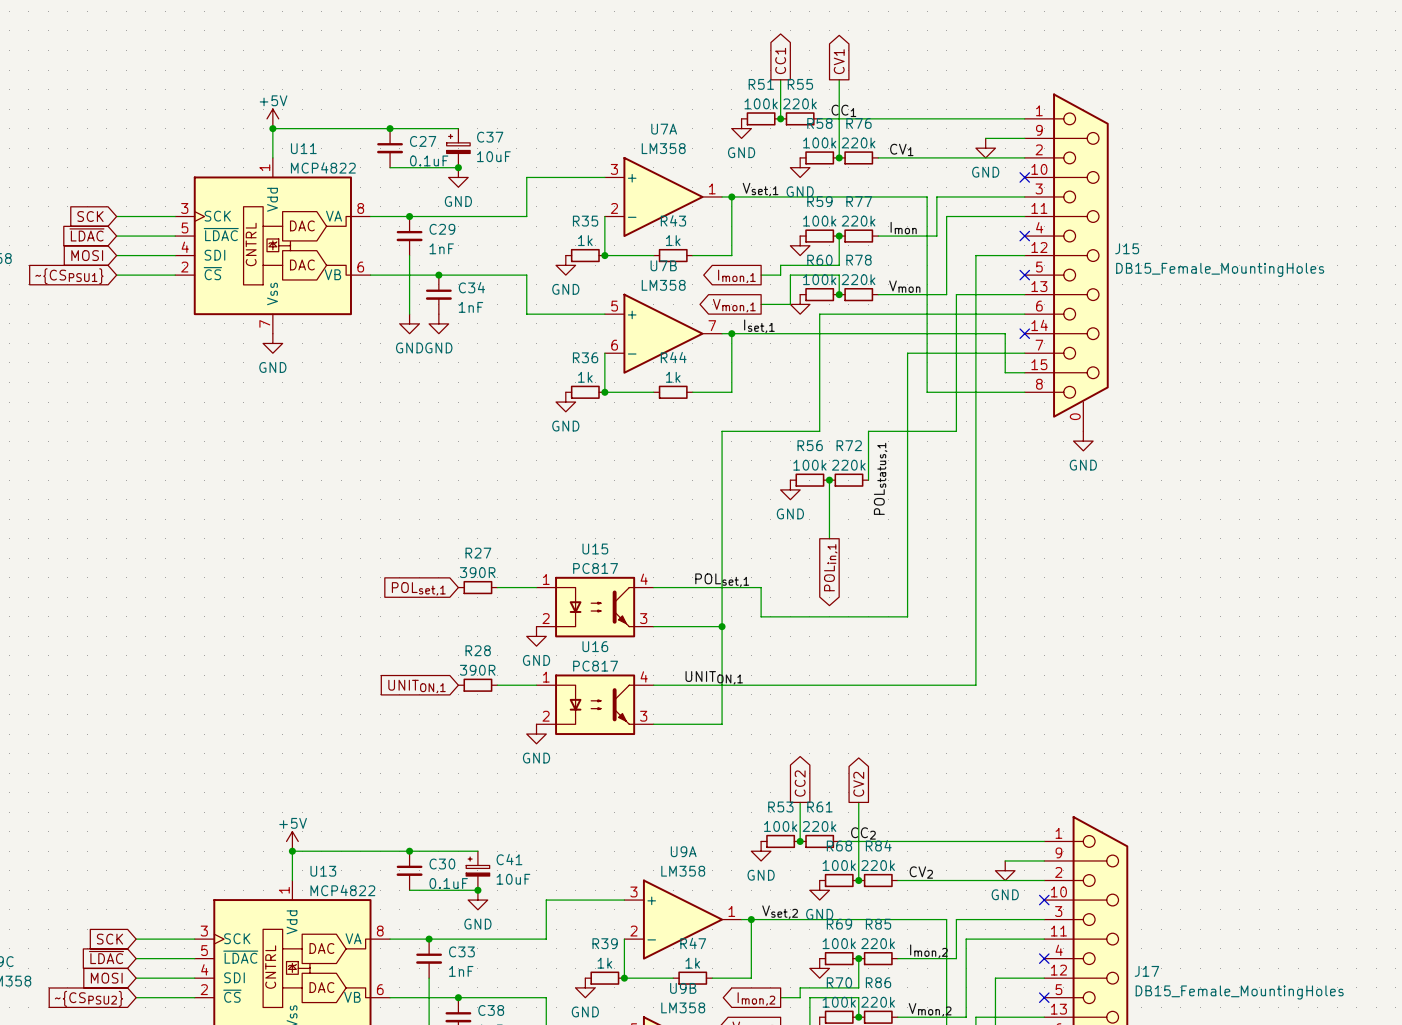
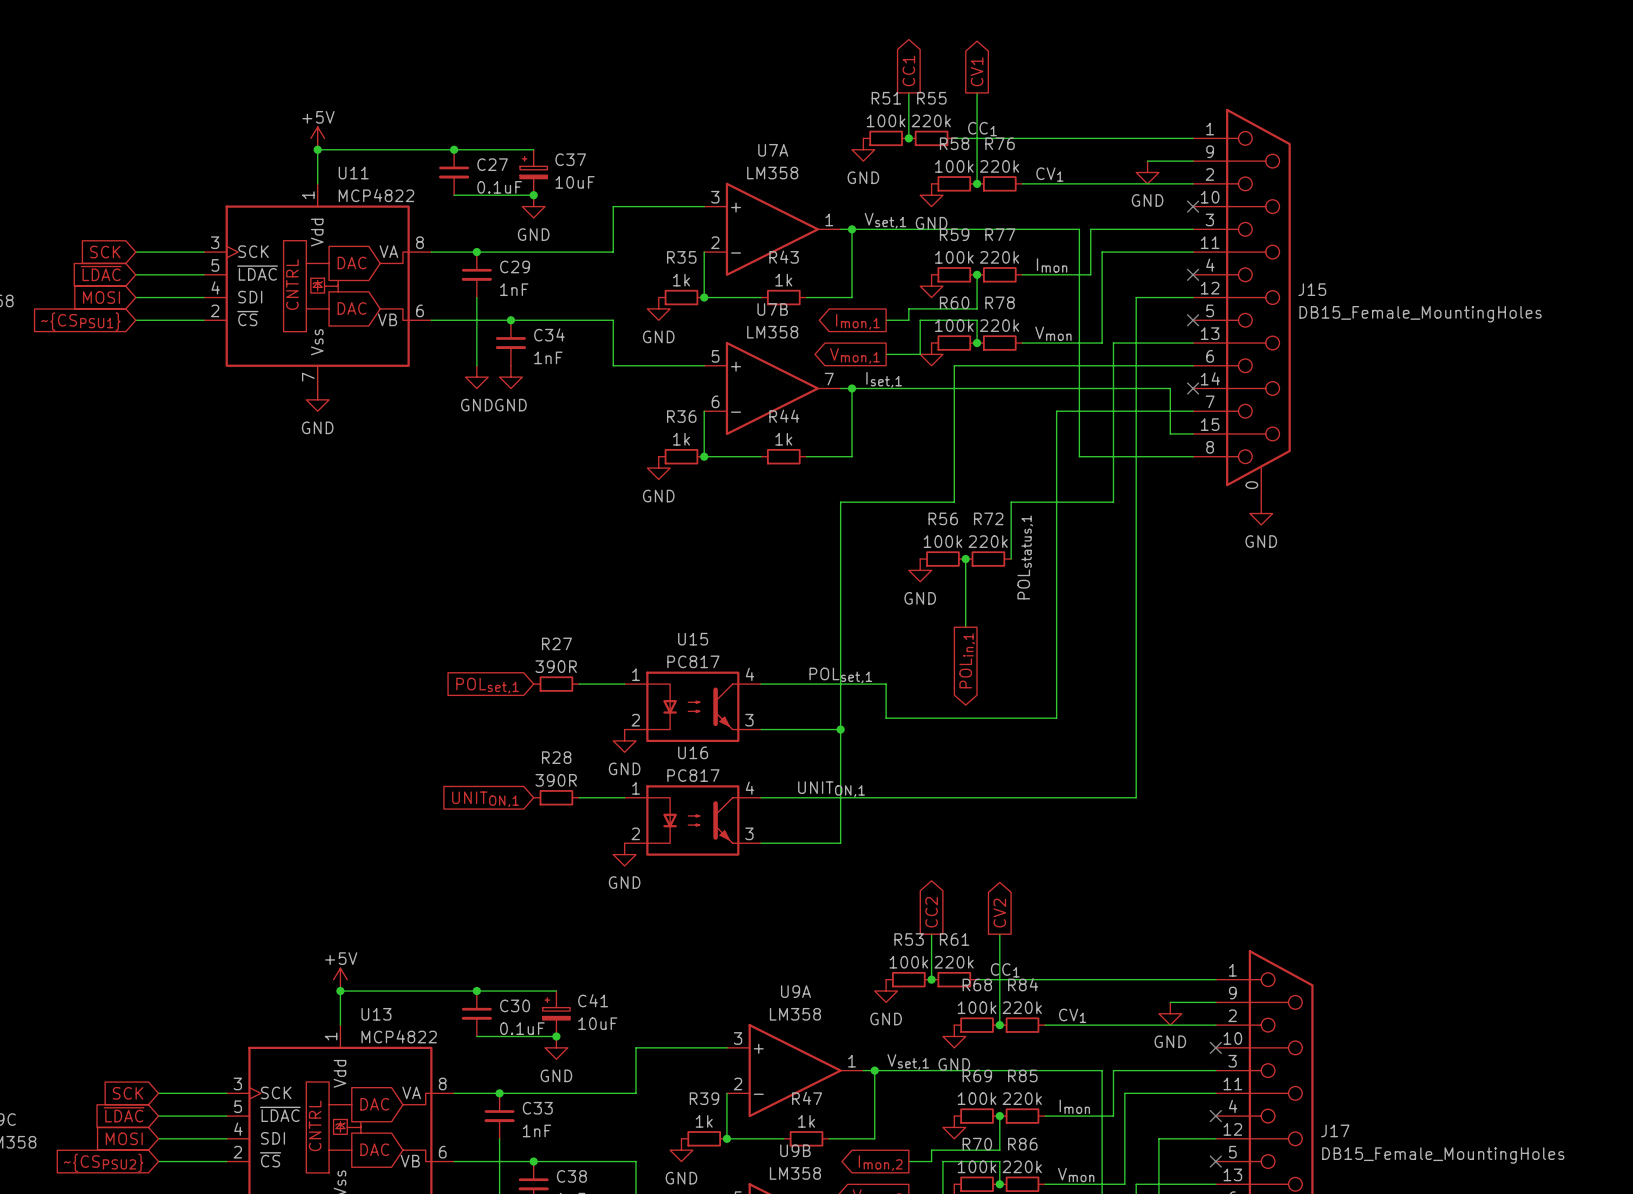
label: CC2 (863, 833) -> CC1 (1005, 970)
label: CV2 (921, 872) -> CV1 (1072, 1015)
label: Vset,2 (780, 912) -> Vset,1 (908, 1061)
label: Imon,2 (928, 951) -> Imon (1074, 1106)
label: Vmon,2 (930, 1009) -> Vmon (1076, 1174)

